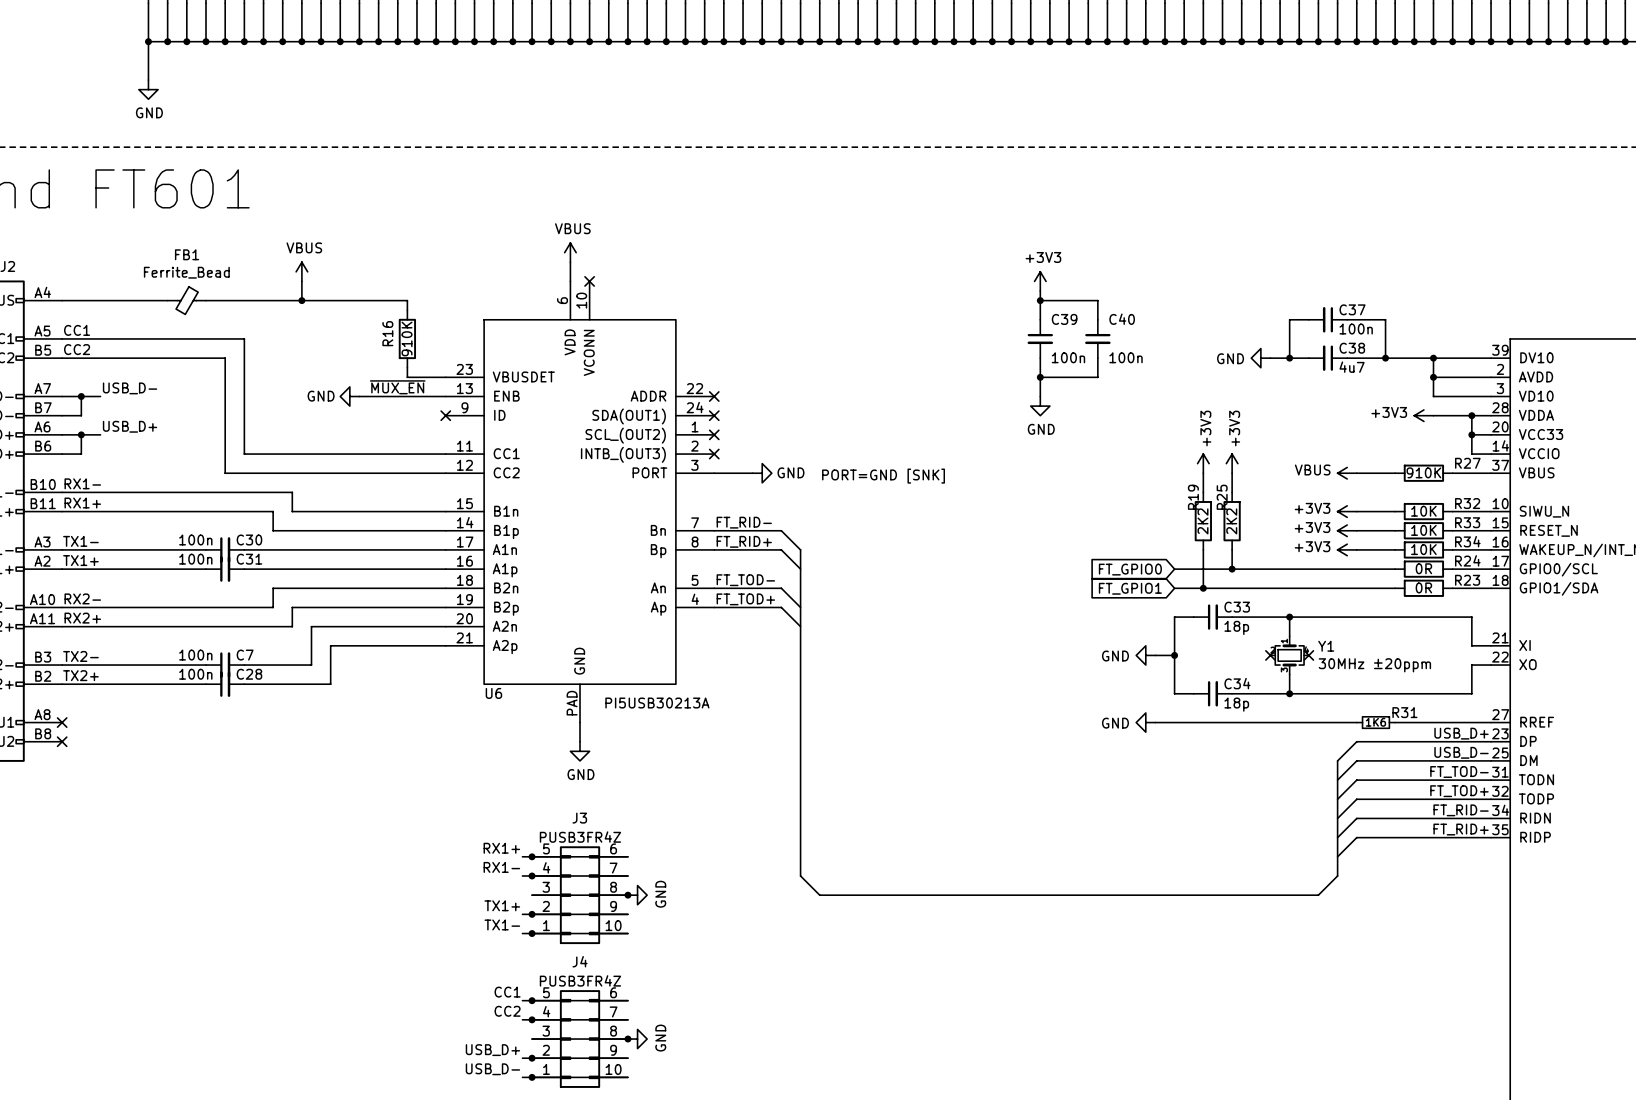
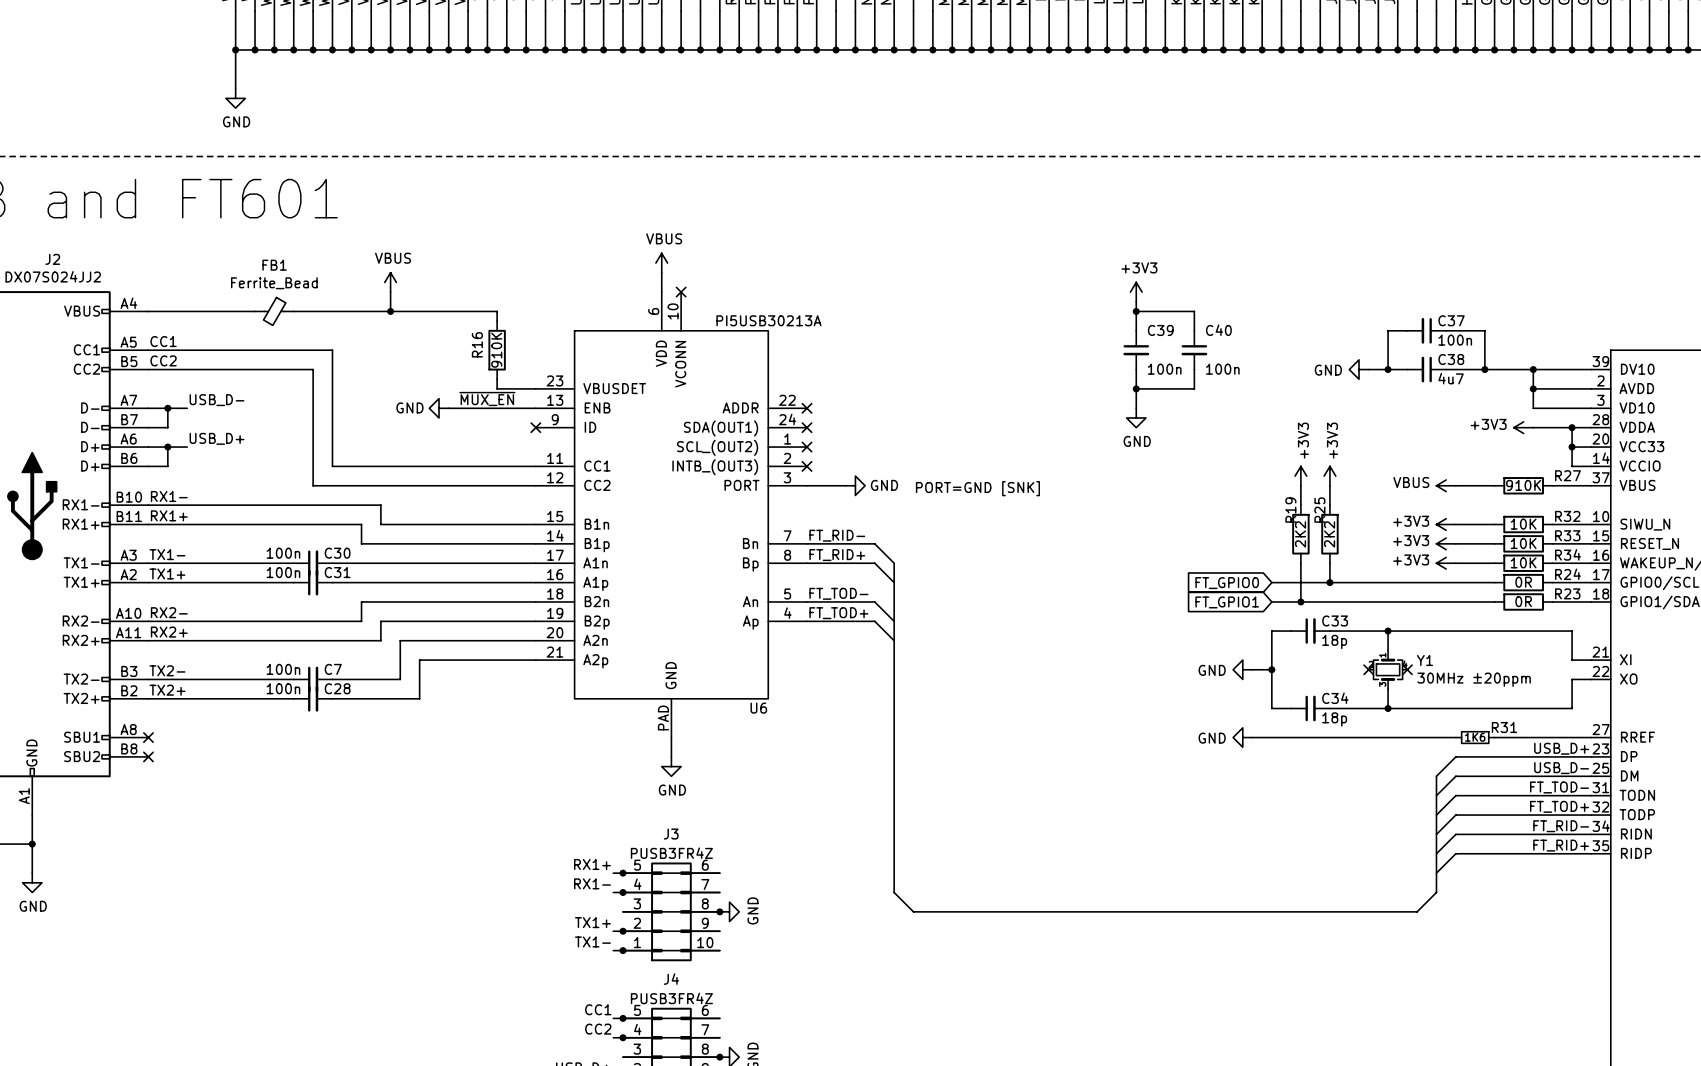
U6 name position: U6 (493, 693) -> U6 (758, 708)
U6 value position: PI5USB30213A (657, 703) -> PI5USB30213A (768, 320)

